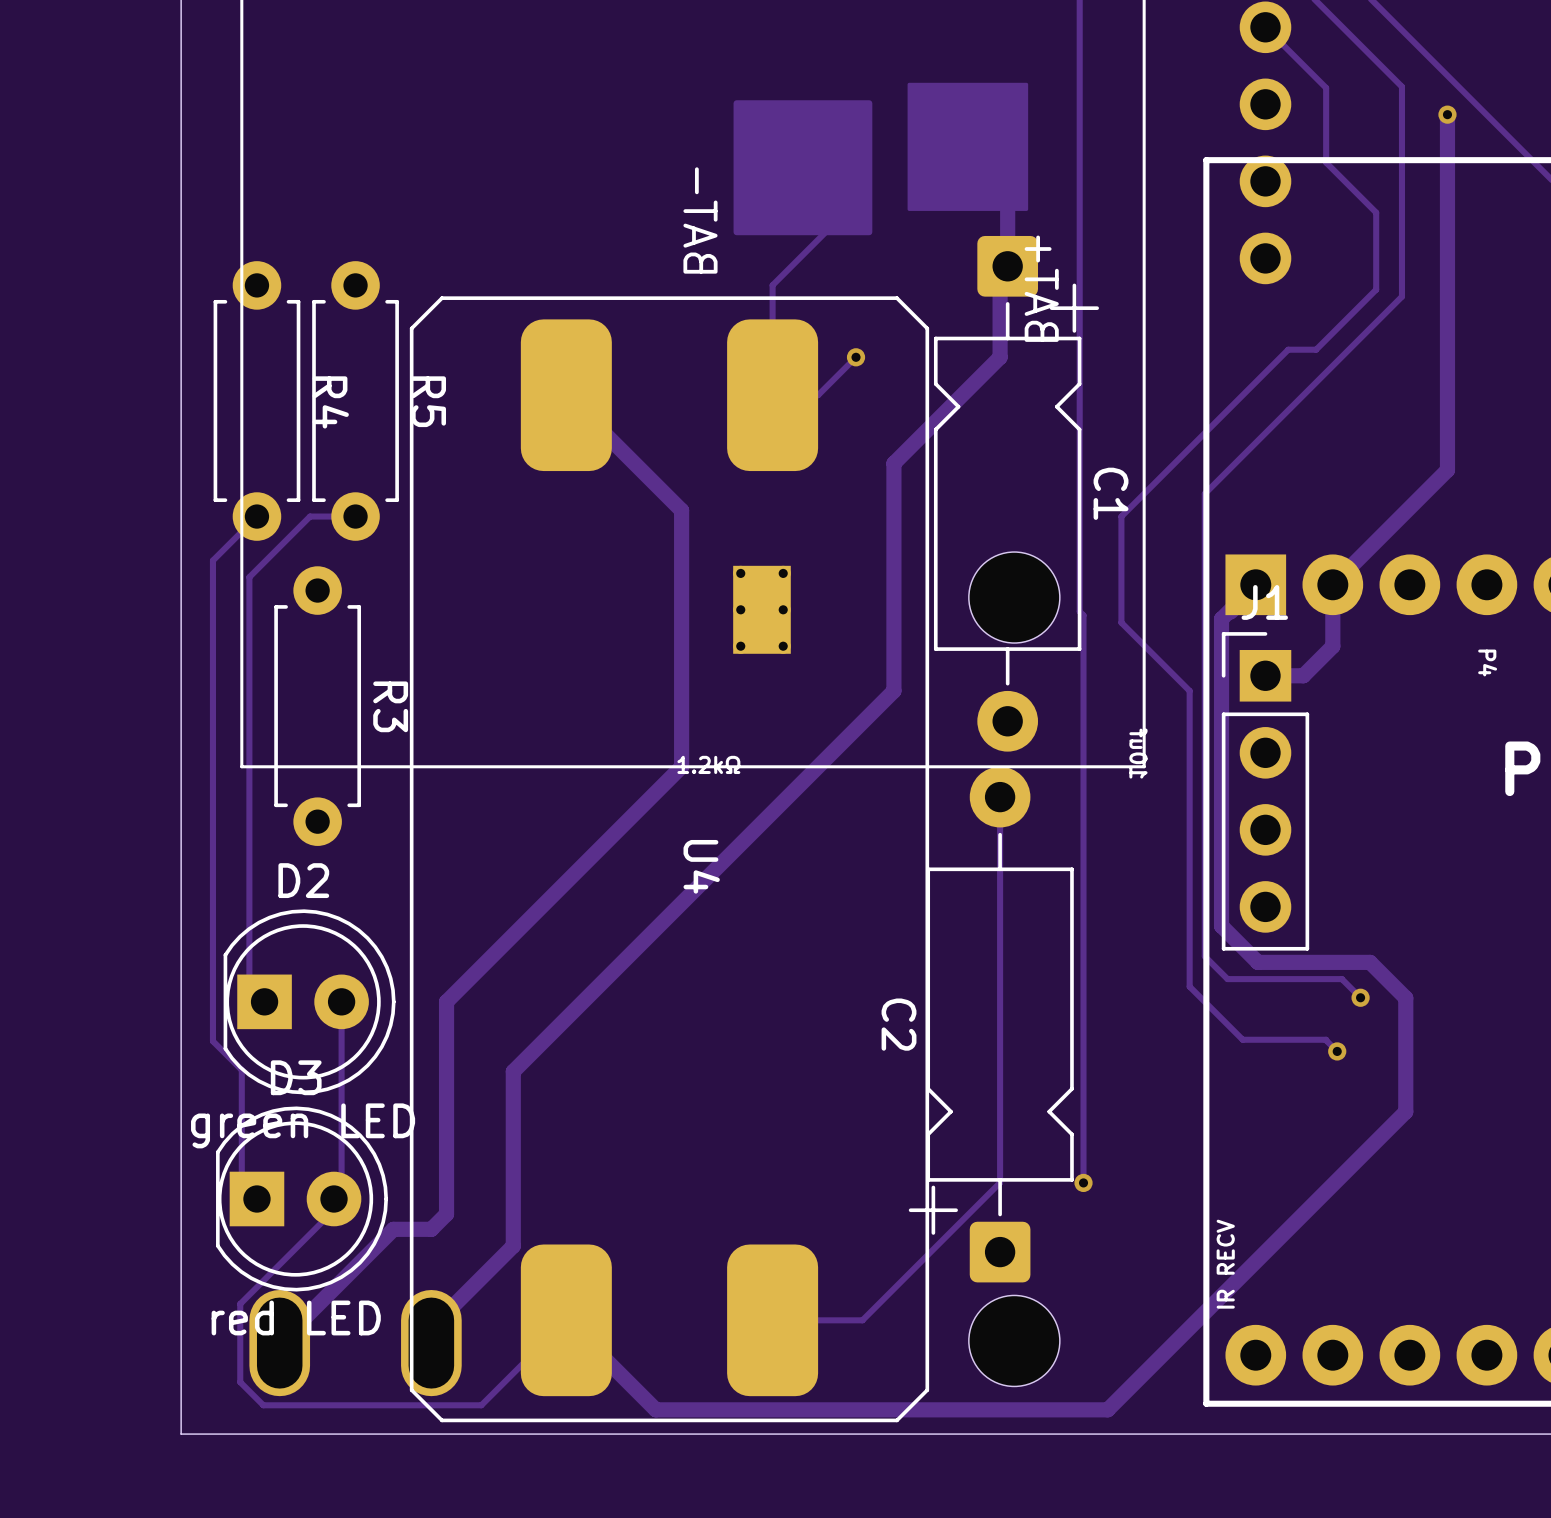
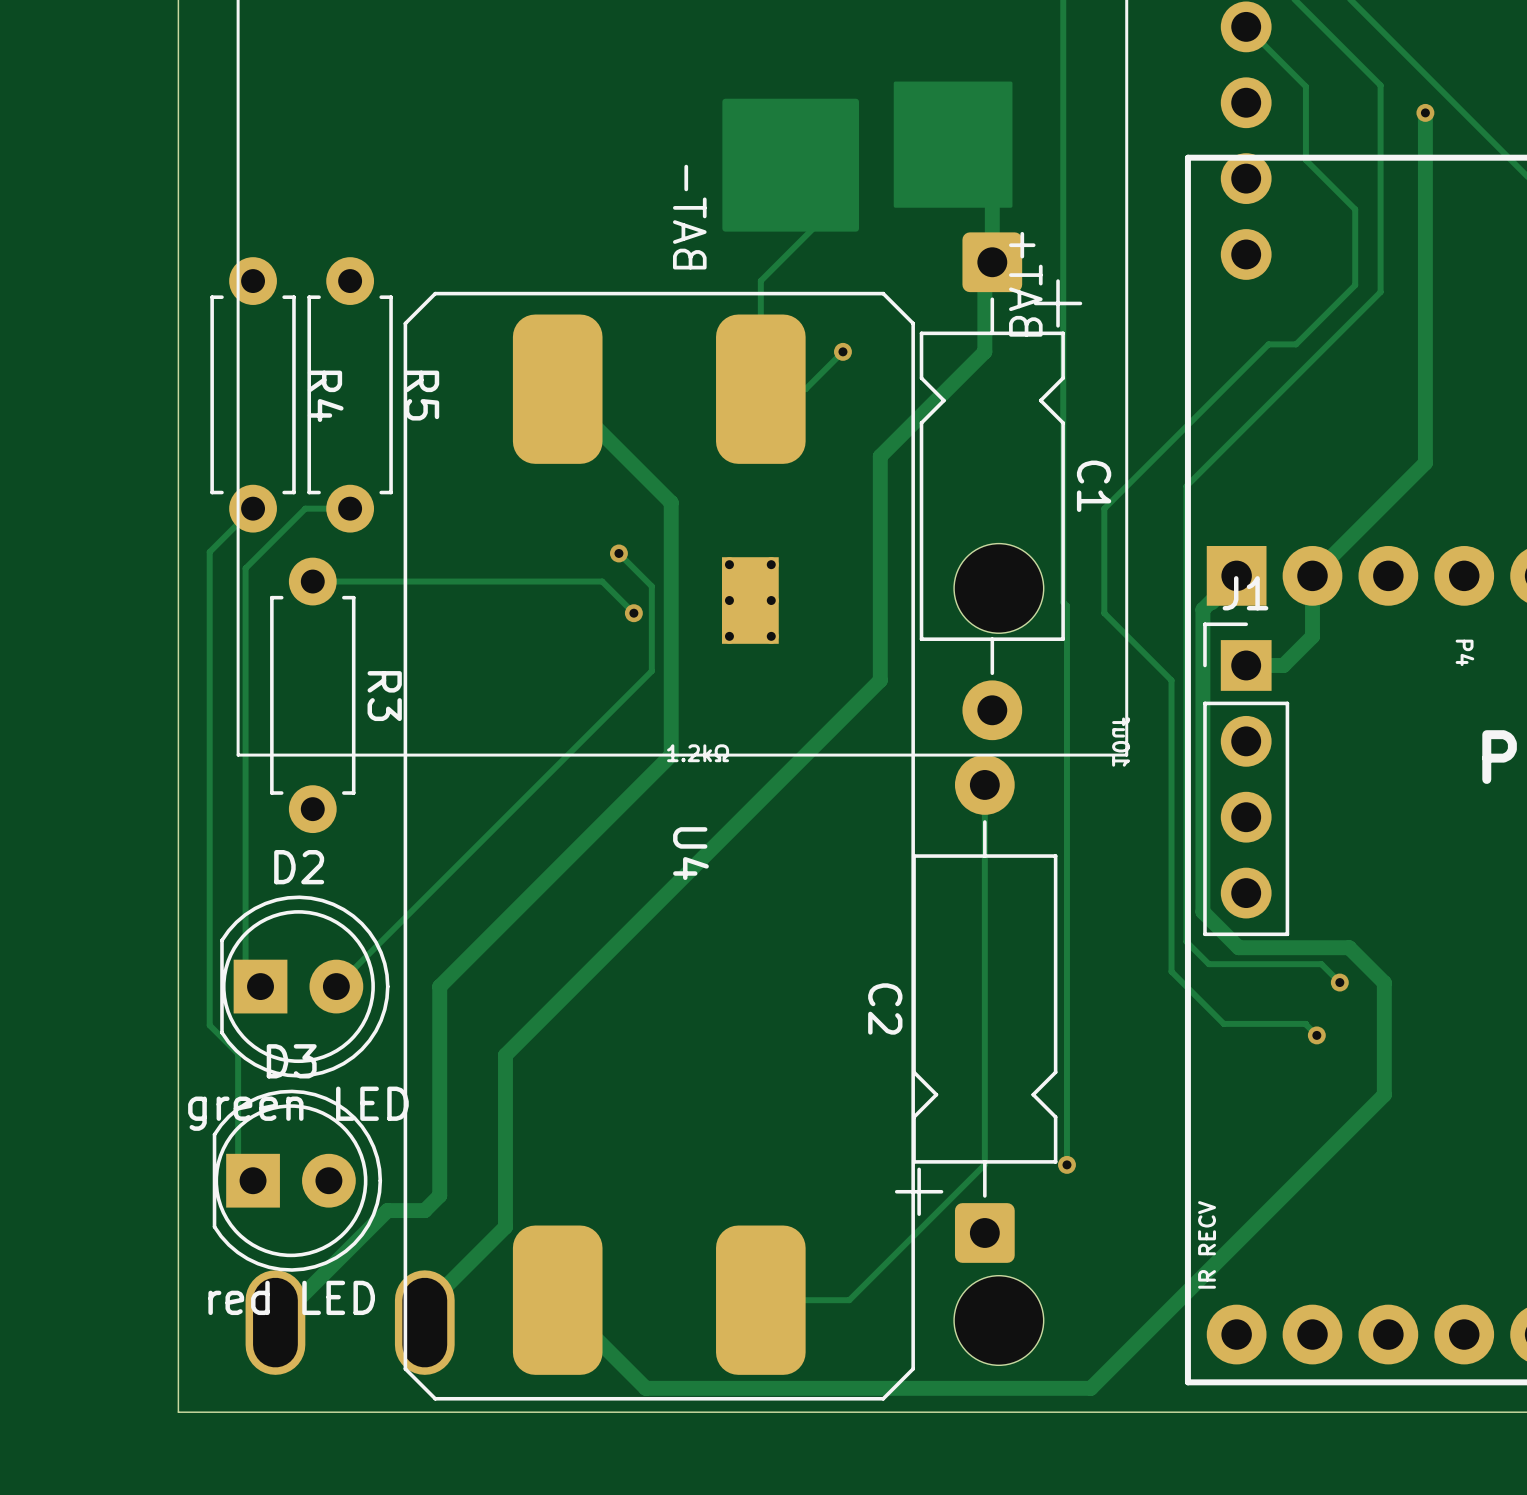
via: none -> (618, 553)
track: none -> (312, 581) (602, 581) (633, 613)
via: none -> (633, 613)
track: (341, 1001) (341, 1202) (240, 1303) (240, 1382) (263, 1405) (481, 1405) (566, 1320) -> (336, 986) (651, 671) (651, 586) (618, 553)

